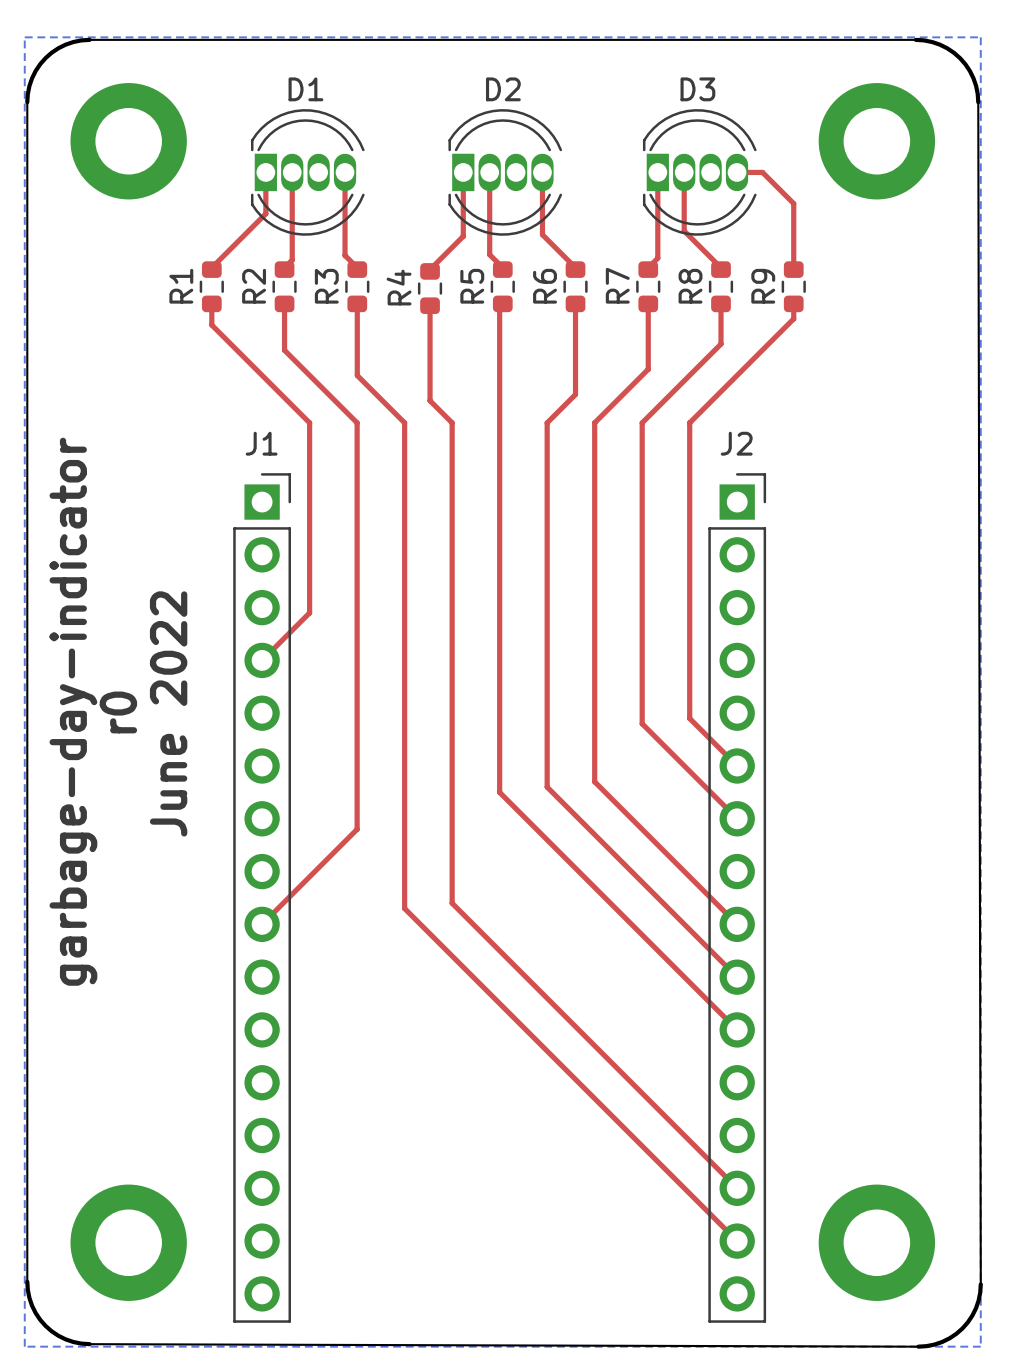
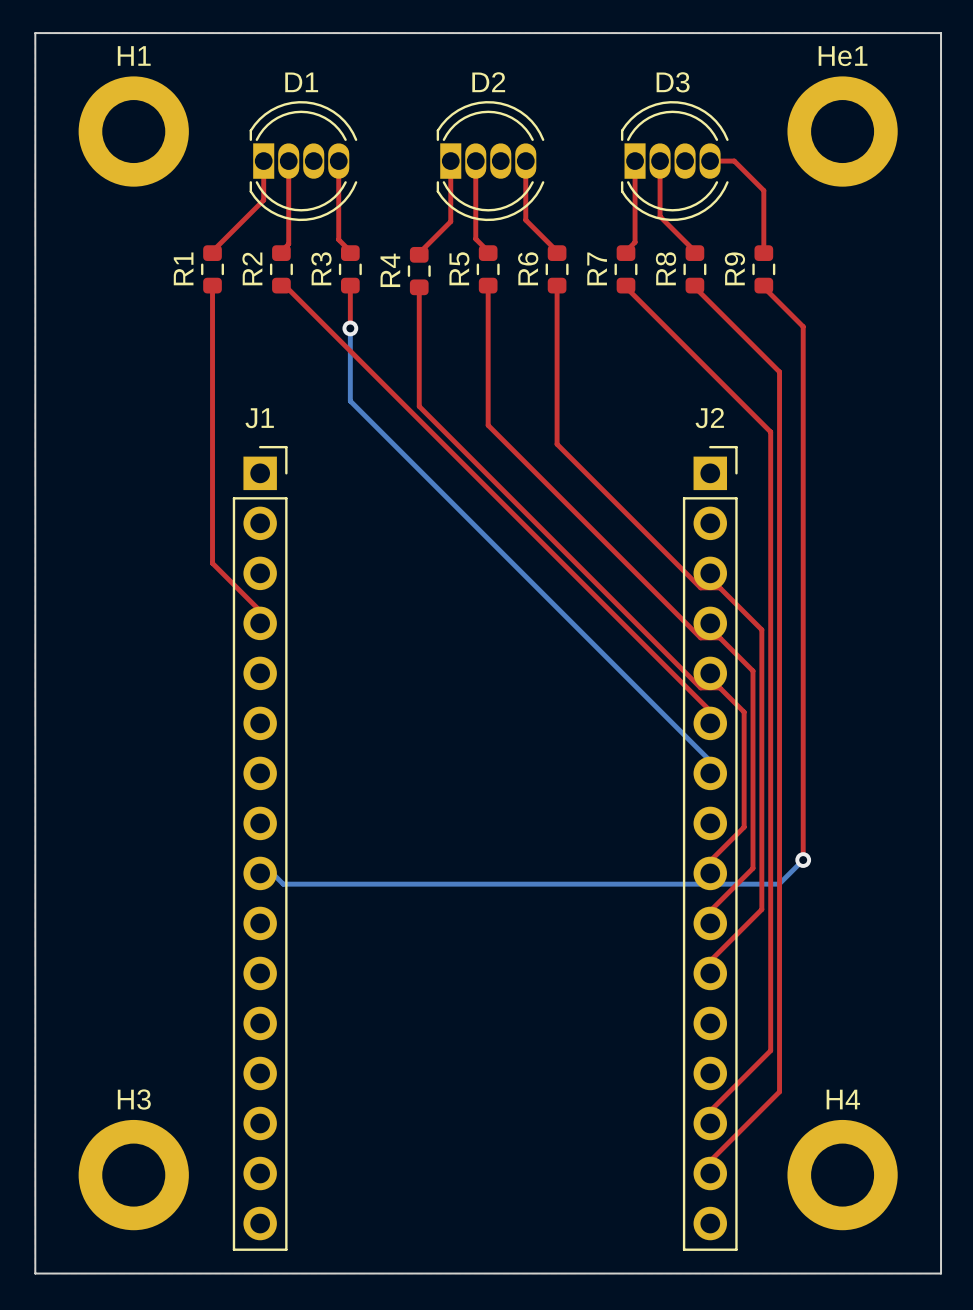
bottom zone outline: (24, 37) (24, 1346) (980, 1346) (980, 37) (24, 37) -> none
board edge: (89, 39) (915, 39) (932, 41) (947, 48) (960, 58) (969, 71) (976, 86) (978, 102) (980, 1284) (978, 1300) (972, 1315) (962, 1328) (949, 1338) (934, 1344) (918, 1346) (89, 1344) (73, 1342) (58, 1335) (45, 1325) (35, 1312) (29, 1297) (27, 1281) (27, 102) (32, 78) (45, 58) (65, 44) (89, 39) -> (35, 33) (35, 1273) (941, 1273) (941, 33) (35, 33)
H1 name: none -> H1 (134, 55)
He1 name: none -> He1 (843, 56)
top track: (284, 303) (284, 350) (357, 422) (357, 829) (262, 924) -> none
top track: none -> (281, 287) (286, 287) (710, 711)
top track: (502, 305) (499, 308) (499, 792) (737, 1029) -> (488, 287) (488, 425) (700, 637) (719, 637) (752, 671) (752, 868) (710, 911)
top track: (648, 305) (648, 369) (594, 422) (594, 781) (737, 924) -> (626, 287) (770, 432) (770, 1050) (710, 1111)
top track: (721, 305) (721, 344) (642, 422) (642, 723) (737, 818) -> (694, 287) (779, 371) (779, 1091) (710, 1161)
top track: (793, 305) (793, 318) (689, 422) (689, 718) (737, 766) -> (763, 287) (803, 326) (803, 860)
top track: (211, 325) (309, 422) (309, 612) (262, 660) -> (212, 305) (212, 563) (260, 610)
top track: (357, 349) (357, 375) (404, 422) (404, 908) (737, 1241) -> none
bottom track: none -> (350, 328) (350, 401) (710, 761)
via: none -> (350, 328)
top track: (575, 394) (547, 422) (547, 787) (737, 977) -> (557, 371) (557, 444) (700, 587) (719, 587) (761, 629) (761, 909) (710, 961)
top track: (430, 400) (452, 422) (452, 903) (737, 1188) -> (419, 377) (419, 406) (700, 687) (719, 687) (744, 712) (744, 827) (710, 861)
text: garbage-day-indicator (73, 711) -> none
text: r0 (118, 712) -> none
text: June 2022 (168, 713) -> none
bottom track: none -> (803, 860) (779, 884) (283, 884) (260, 861)
via: none -> (803, 860)
H4 name: none -> H4 (843, 1099)
H3 name: none -> H3 (134, 1099)

